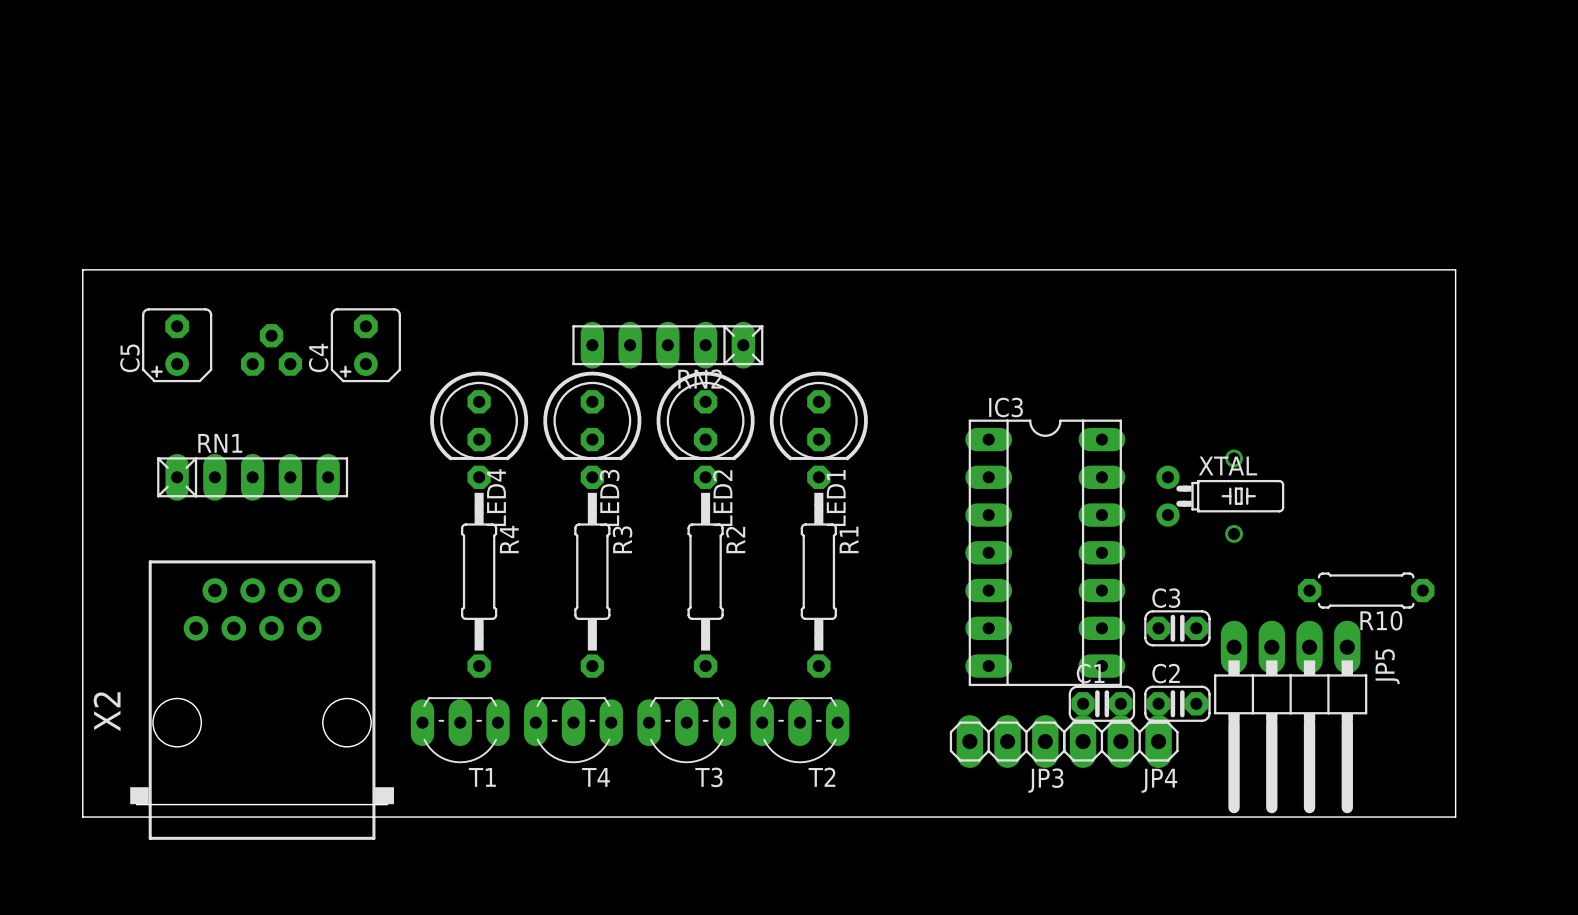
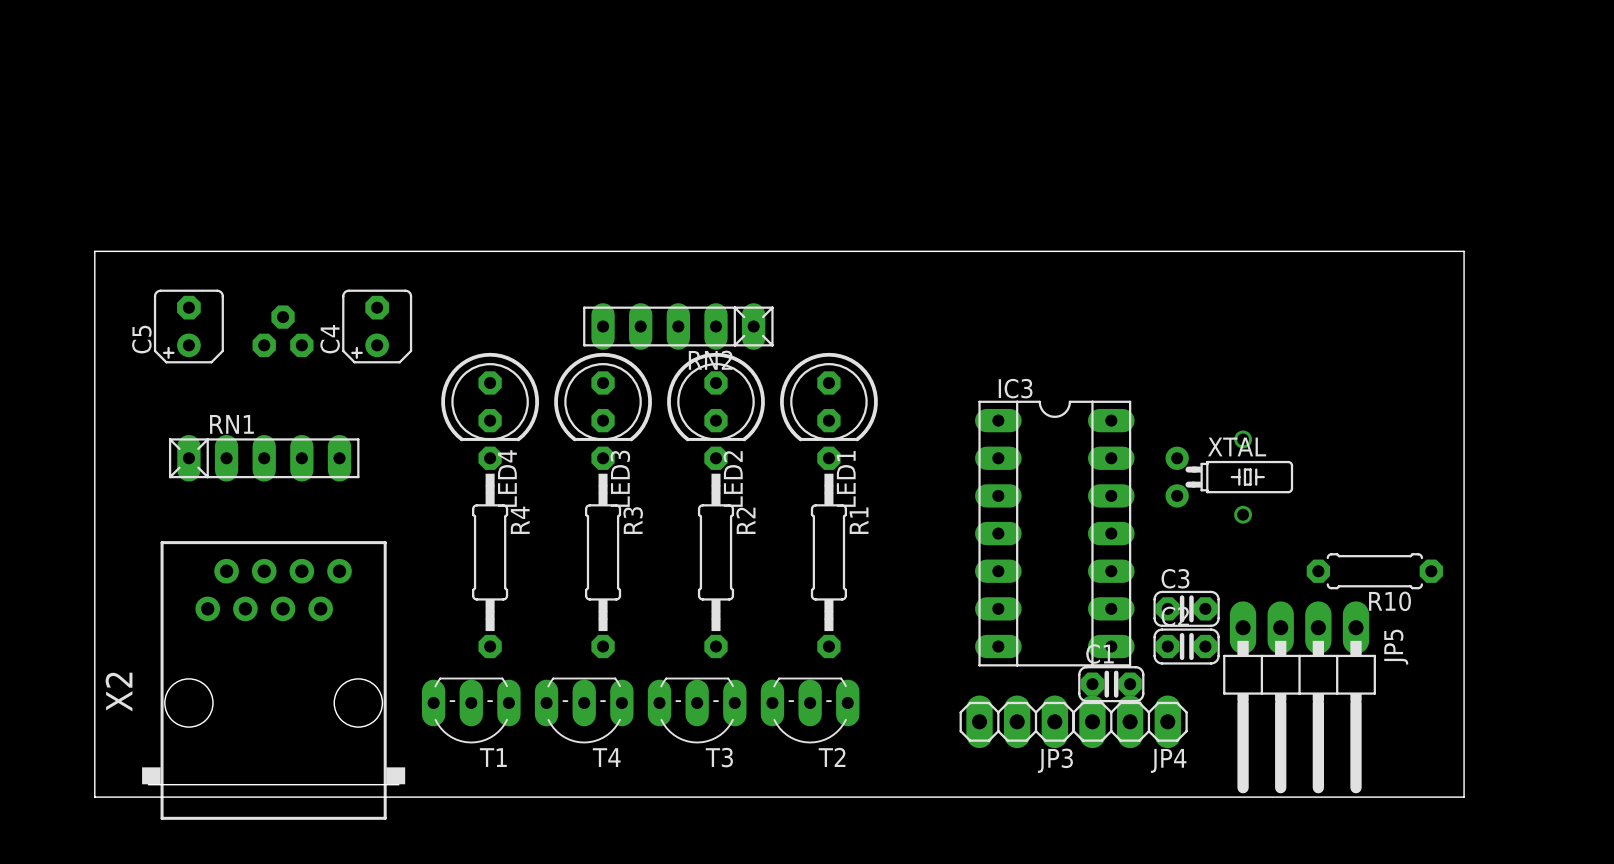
C2 position: (1177, 703) -> (1186, 646)

